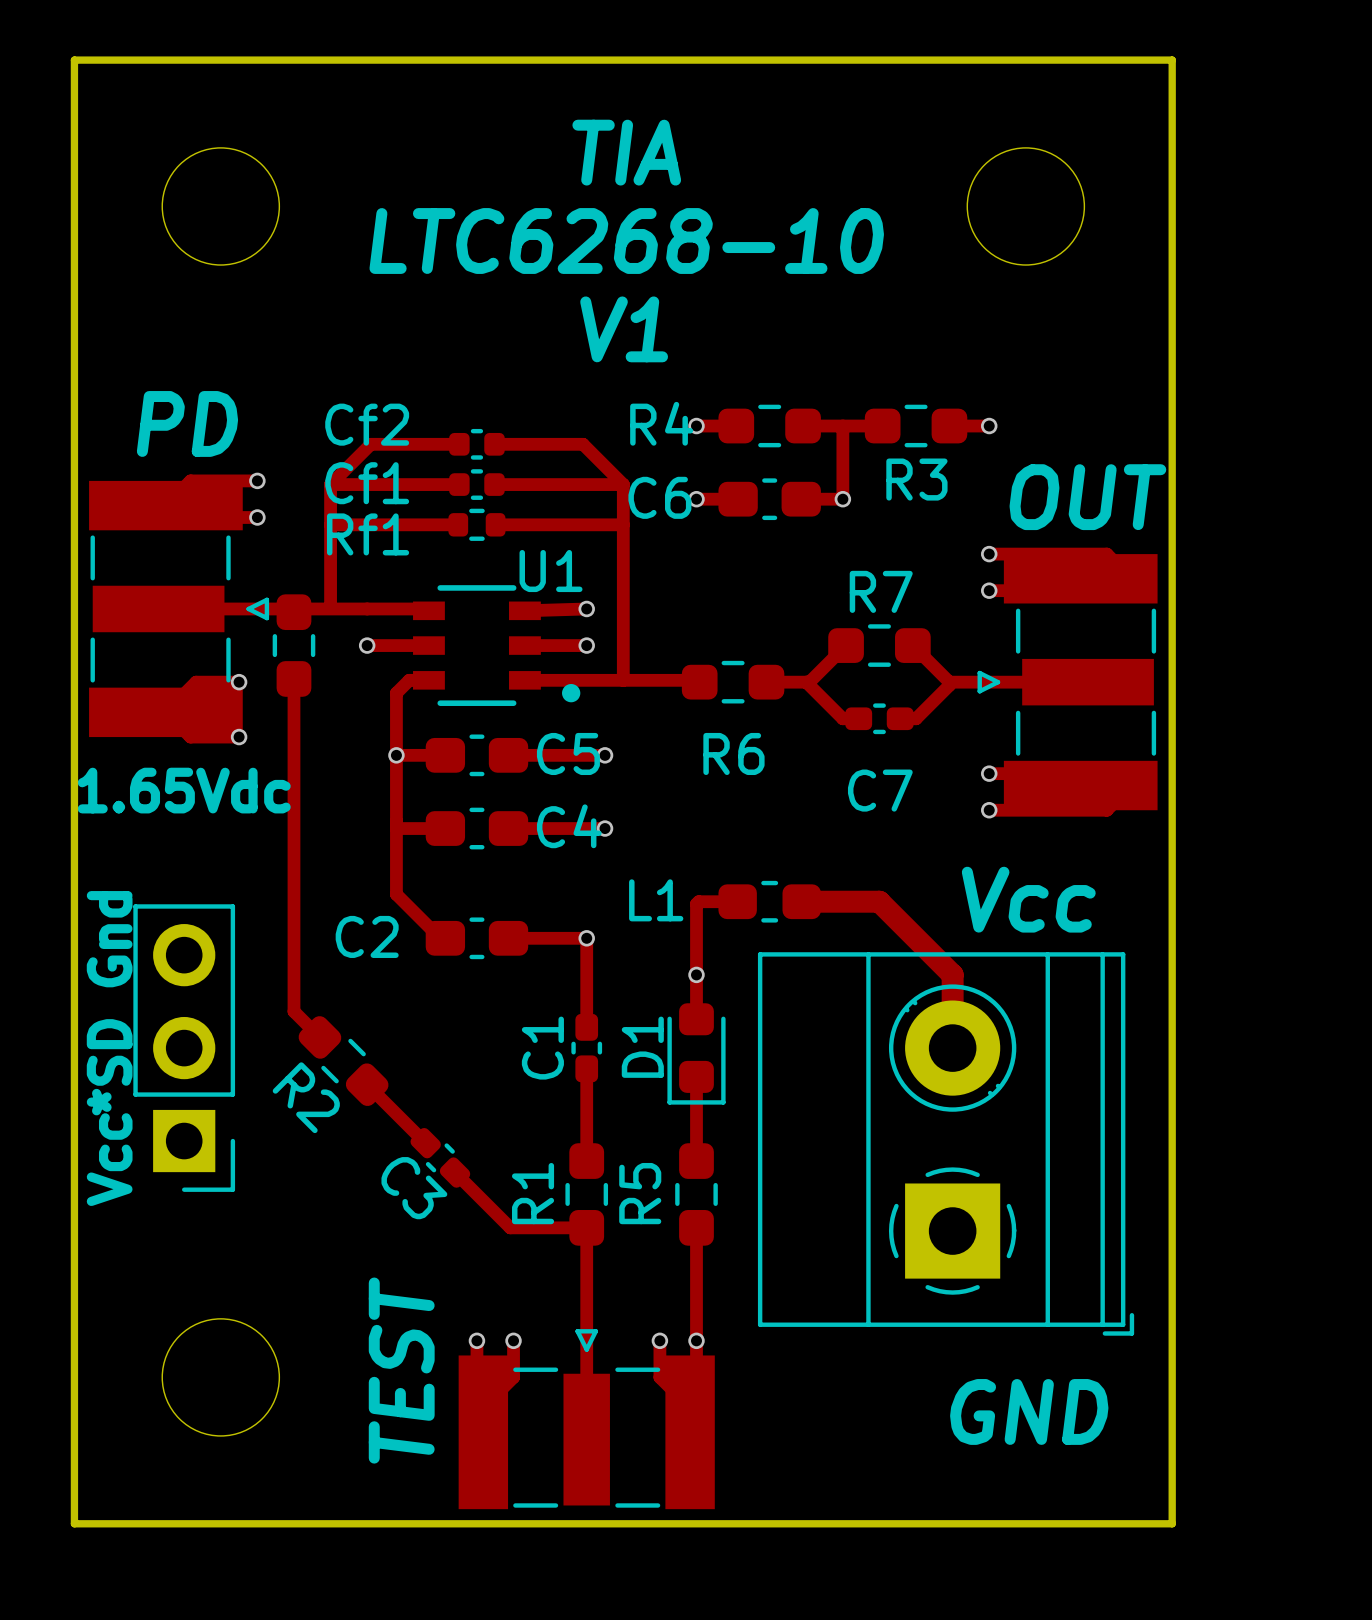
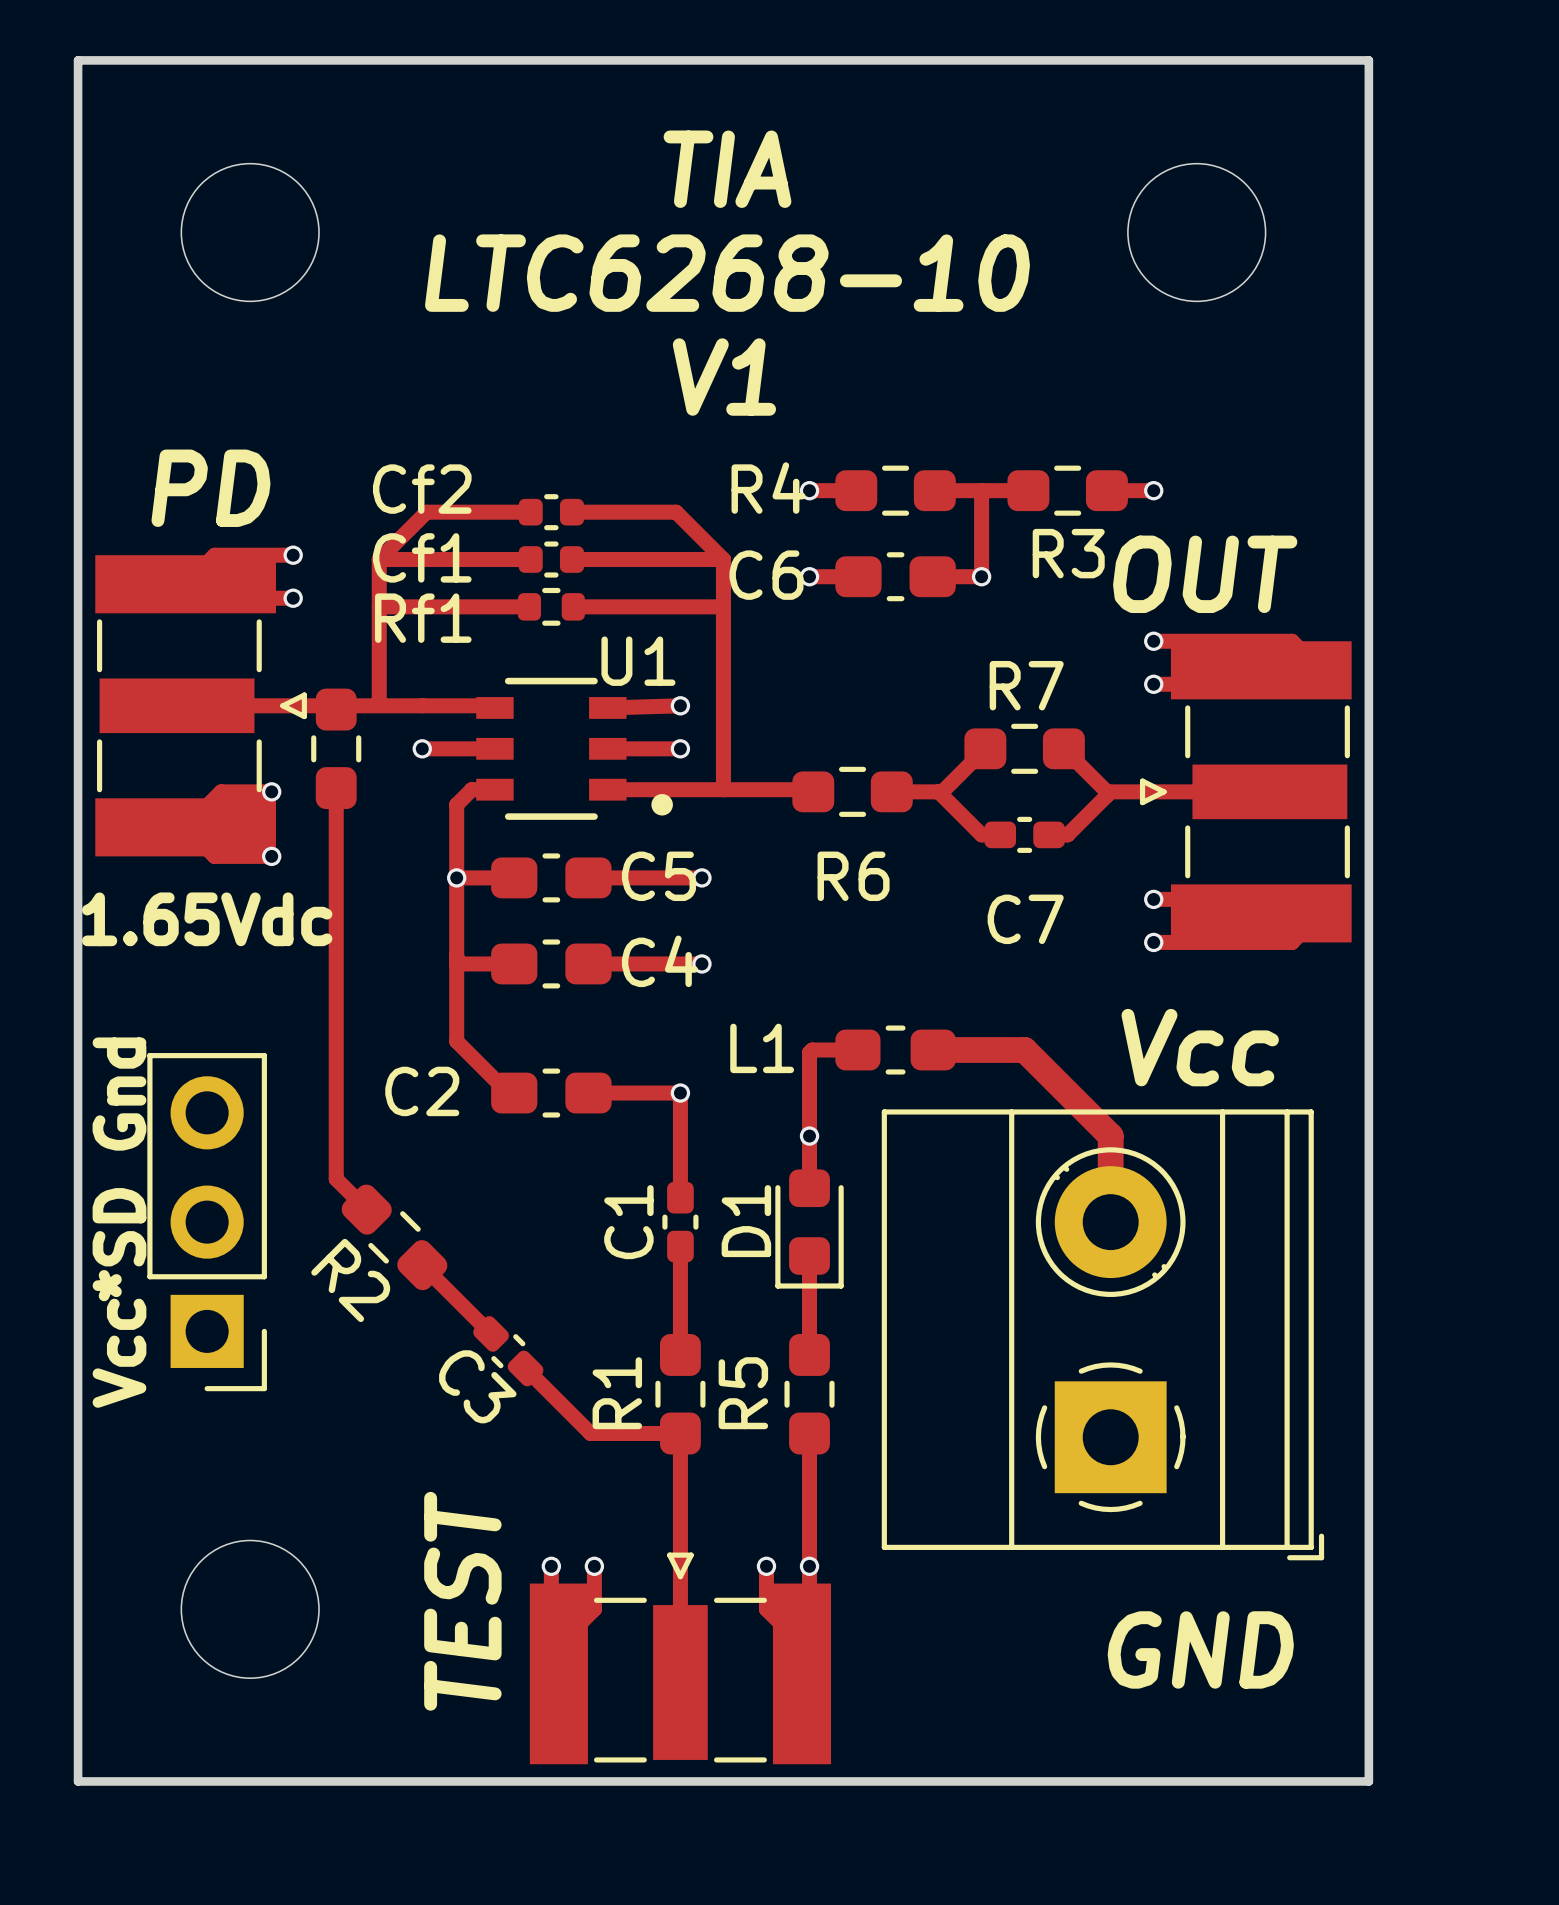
text position: OUT (1087, 497) -> OUT (1205, 574)

